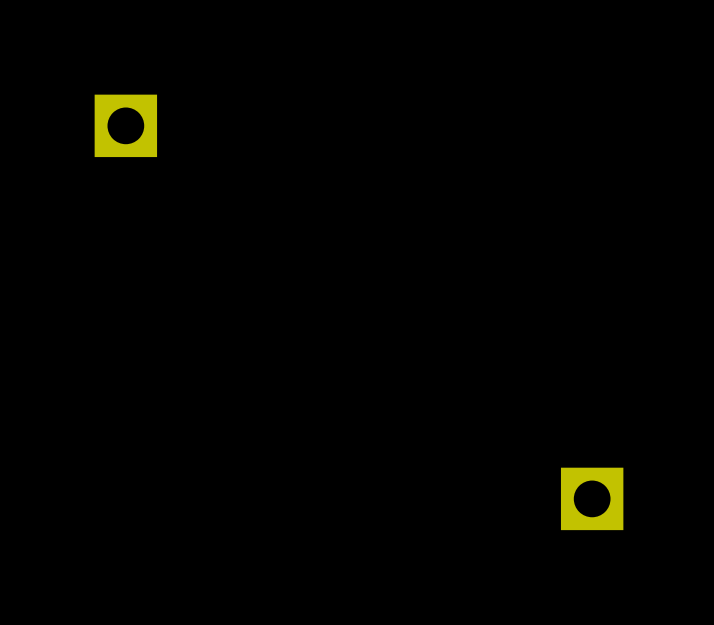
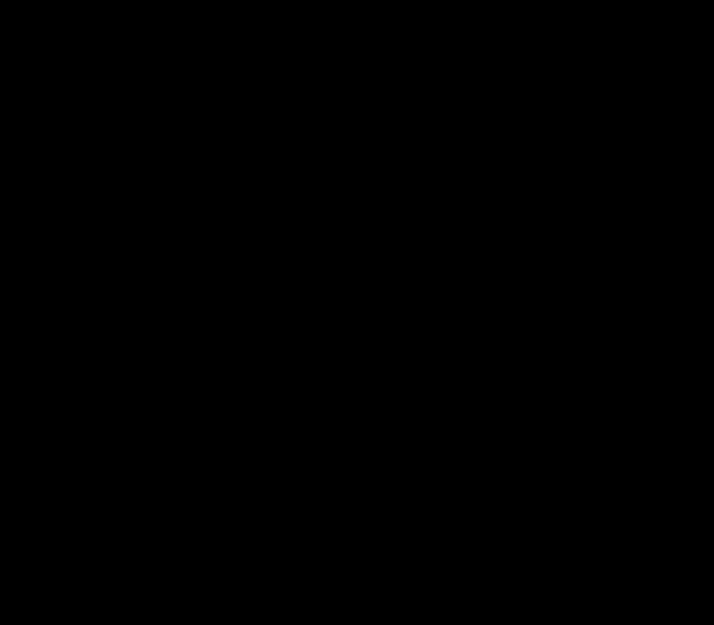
part: (125, 125) -> none
part: (592, 498) -> none

